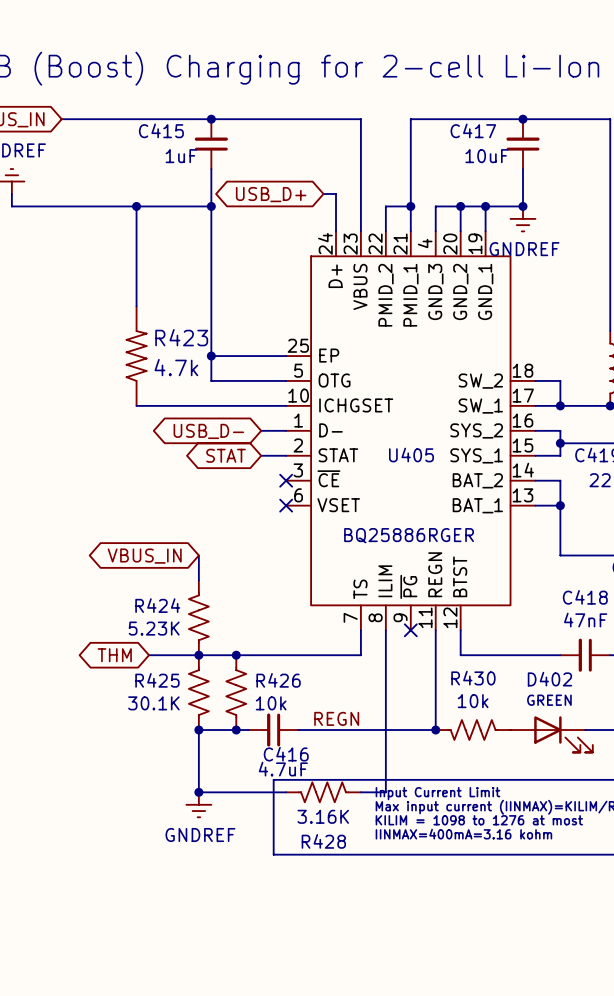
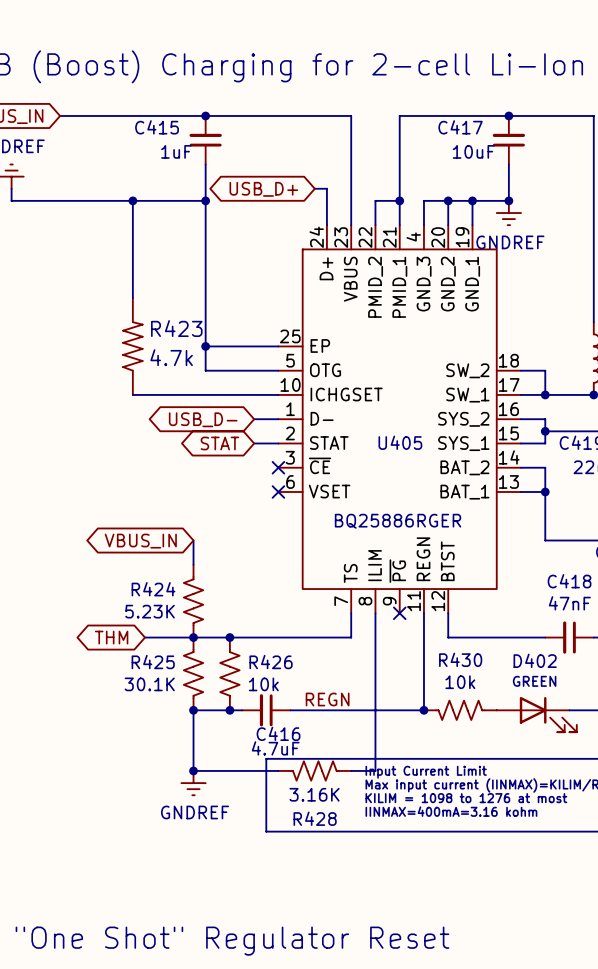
text: none -> "One Shot" Regulator Reset (232, 941)

